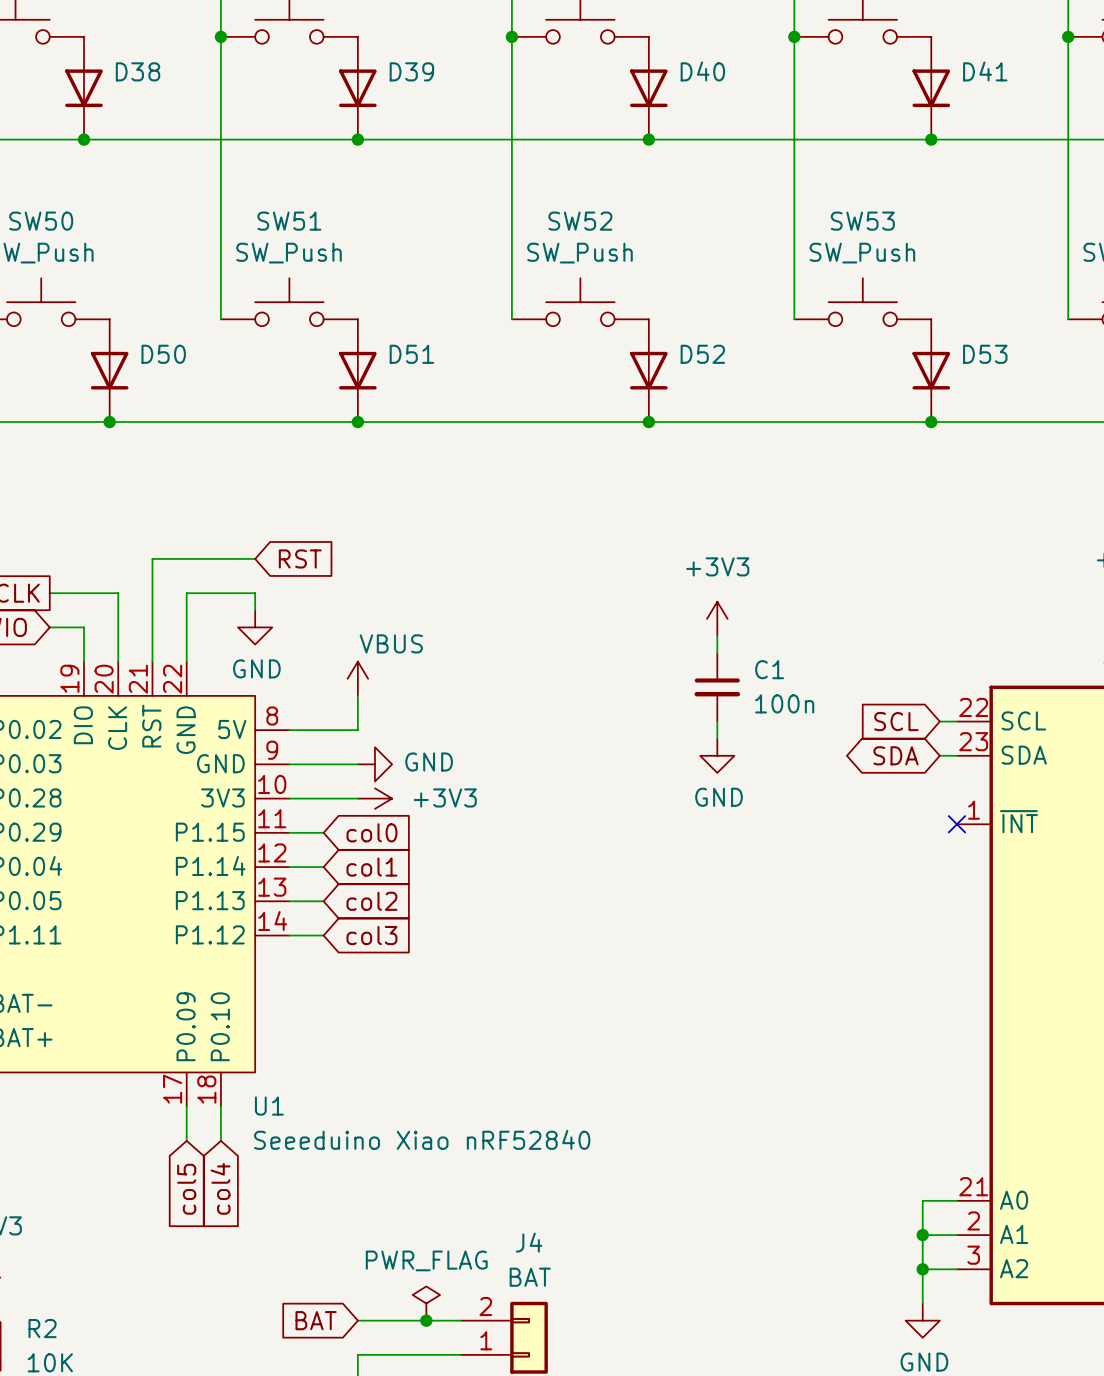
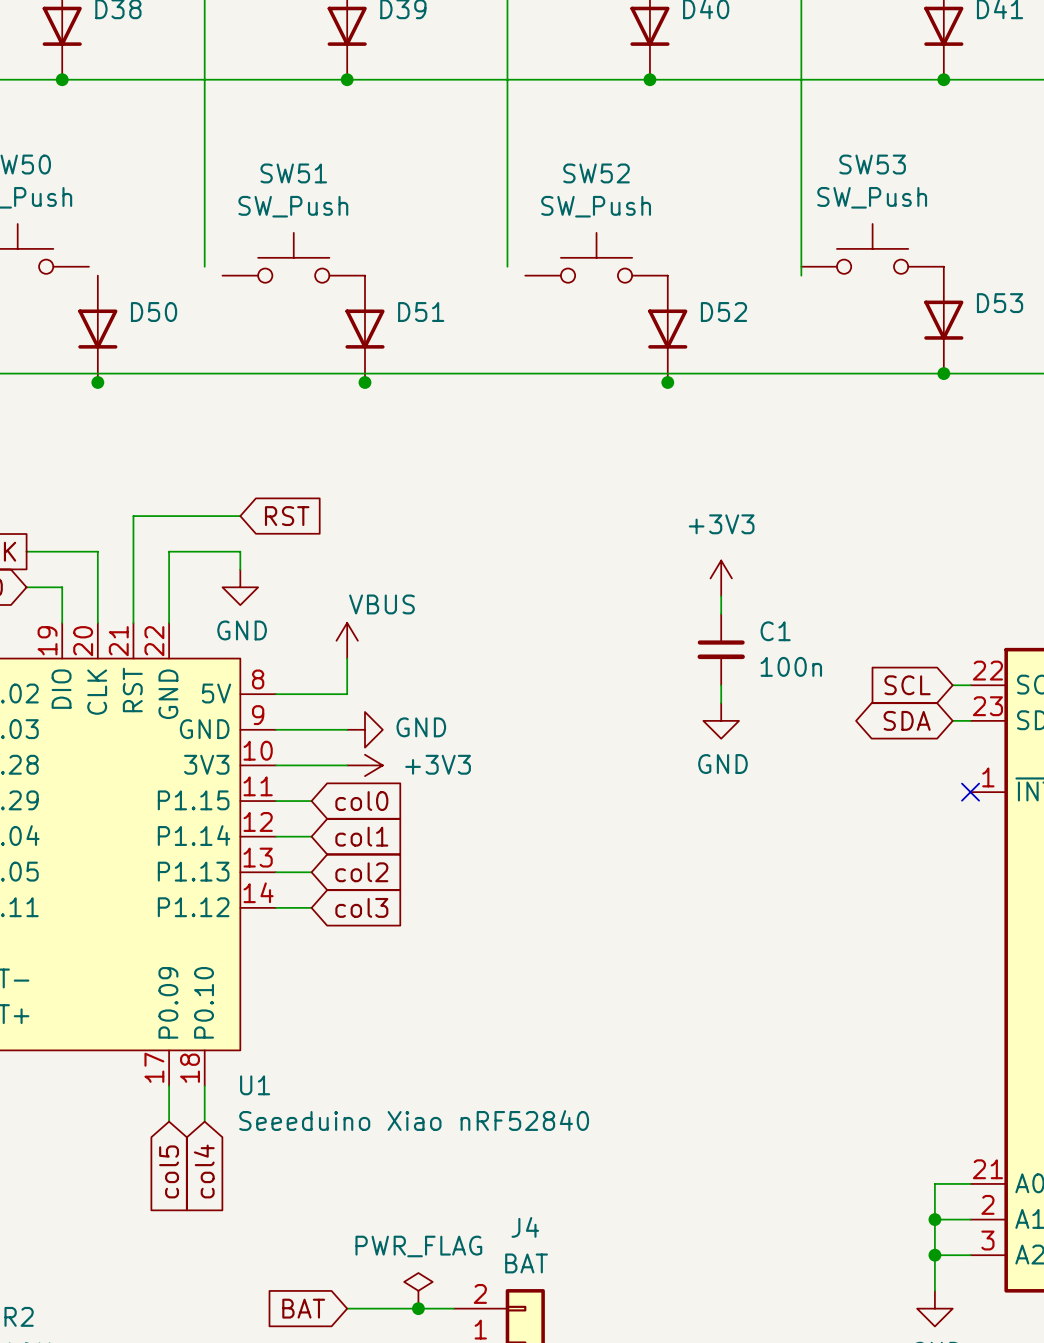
SW51 position: (289, 302) -> (293, 257)
SW52 position: (580, 302) -> (596, 257)
wire: none -> (801, 266) (801, 275)
D50 position: (109, 370) -> (97, 329)
D51 position: (357, 370) -> (364, 329)
D52 position: (648, 370) -> (667, 329)
junction position: (109, 422) -> (97, 382)
junction position: (357, 422) -> (364, 382)
junction position: (648, 422) -> (667, 382)

